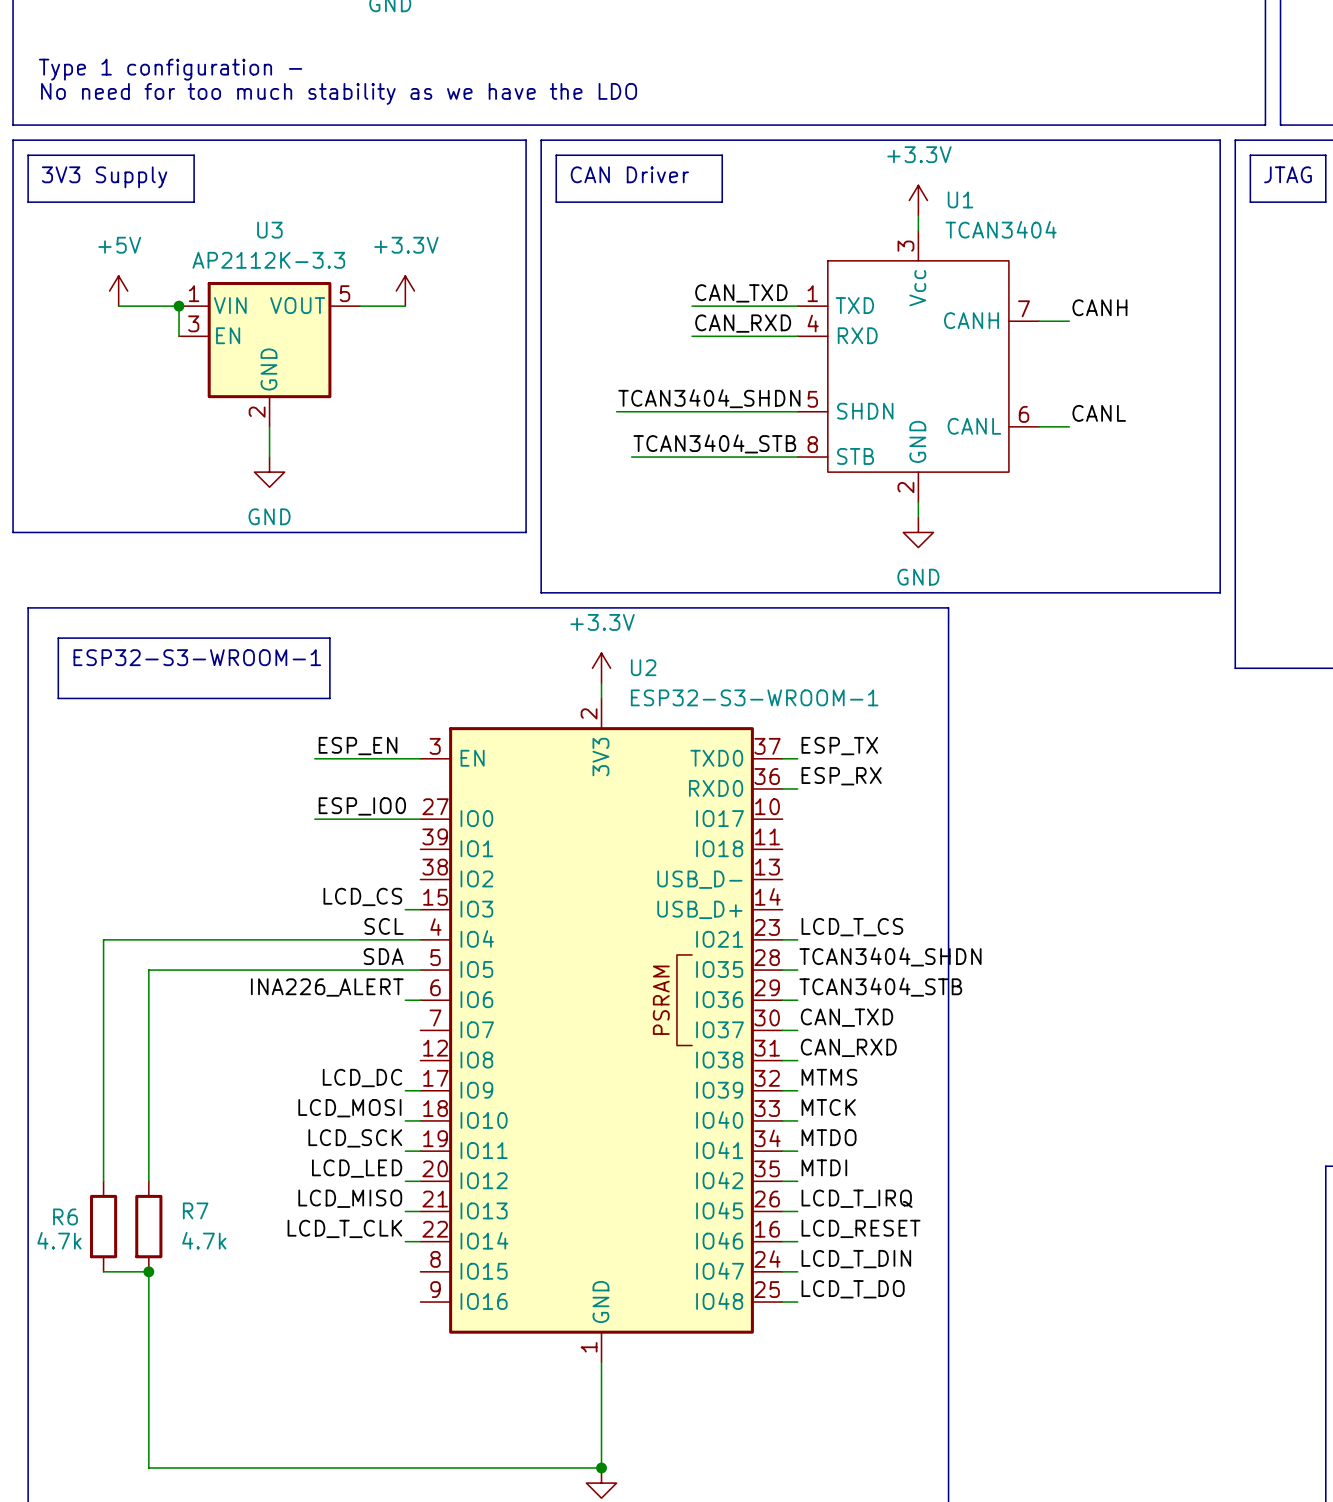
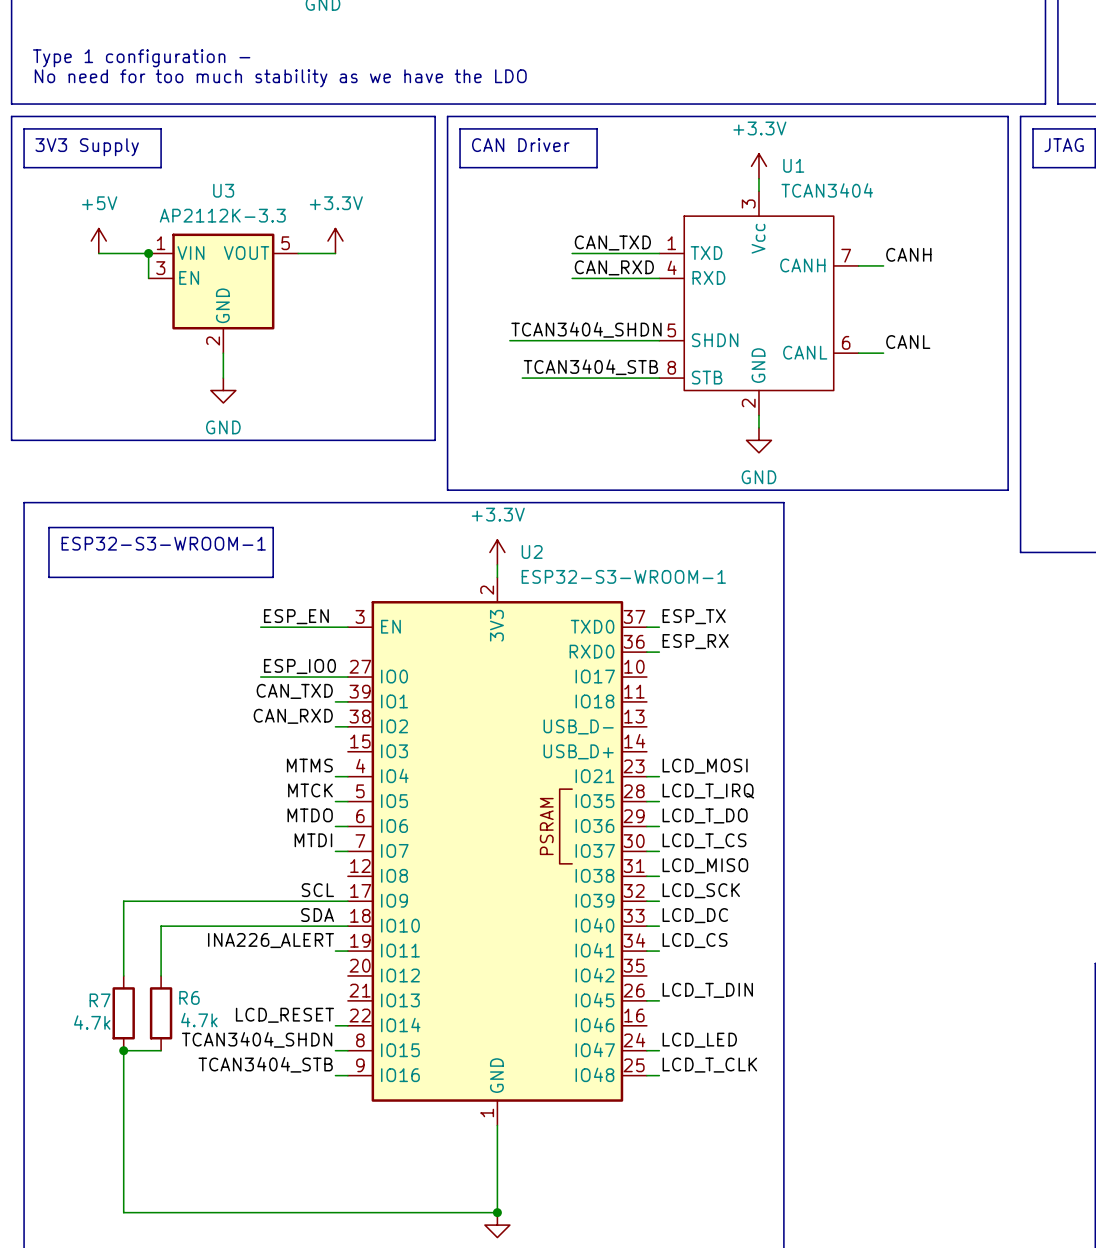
label: none -> CAN_TXD (294, 691)
wire: none -> (335, 701) (347, 701)
label: none -> CAN_RXD (293, 716)
wire: none -> (335, 726) (347, 726)
label: LCD_CS (362, 896) -> none
wire: (405, 909) (420, 909) -> (335, 851) (347, 851)
label: SCL (384, 926) -> MTMS (309, 765)
label: LCD_T_CS (852, 927) -> LCD_MOSI (705, 766)
wire: (405, 939) (103, 939) (103, 1181) -> none
label: SDA (383, 956) -> MTCK (310, 790)
label: TCAN3404_SHDN (890, 956) -> LCD_T_IRQ (708, 791)
wire: (405, 970) (148, 970) (148, 1090) -> (335, 901) (123, 901)
label: INA226_ALERT (327, 987) -> MTDO (310, 815)
label: TCAN3404_STB (880, 987) -> LCD_T_DO (705, 815)
label: none -> MTDI (313, 840)
label: CAN_TXD (847, 1017) -> LCD_T_CS (704, 840)
label: CAN_RXD (848, 1047) -> LCD_MISO (705, 865)
label: MTMS (829, 1077) -> LCD_SCK (701, 890)
label: LCD_DC (362, 1078) -> SCL (317, 890)
label: MTCK (828, 1107) -> LCD_DC (695, 915)
label: LCD_MOSI (349, 1108) -> SDA (317, 915)
wire: none -> (335, 926) (161, 926) (161, 975)
label: MTDO (829, 1137) -> LCD_CS (695, 940)
label: LCD_SCK (355, 1138) -> INA226_ALERT (271, 940)
label: MTDI (824, 1167) -> none
label: LCD_LED (357, 1168) -> none
wire: (405, 1181) (420, 1181) -> (335, 1050) (347, 1050)
wire: (782, 1181) (797, 1181) -> none
label: LCD_MISO (350, 1198) -> none
label: LCD_T_IRQ (857, 1198) -> LCD_T_DIN (707, 990)
R7 name position: R7 (195, 1210) -> R7 (100, 1000)
wire: (405, 1211) (420, 1211) -> (335, 1075) (347, 1075)
R6 name position: R6 (65, 1216) -> R6 (189, 997)
R6 position: (103, 1226) -> (161, 1013)
label: LCD_T_CLK (344, 1228) -> LCD_RESET (284, 1015)
label: LCD_RESET (861, 1228) -> none
R6 value position: 4.7k (59, 1240) -> 4.7k (199, 1020)
R7 value position: 4.7k (204, 1240) -> 4.7k (92, 1022)
wire: (782, 1241) (797, 1241) -> none
label: none -> TCAN3404_SHDN (257, 1039)
label: LCD_T_DIN (856, 1259) -> LCD_LED (699, 1040)
wire: (103, 1271) (148, 1271) -> (161, 1050) (123, 1050)
label: none -> TCAN3404_STB (265, 1064)
label: LCD_T_DO (853, 1289) -> LCD_T_CLK (709, 1065)

